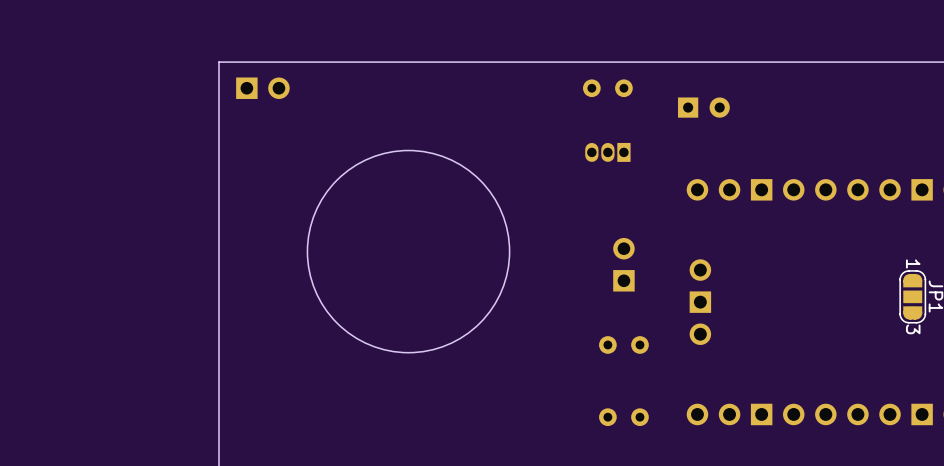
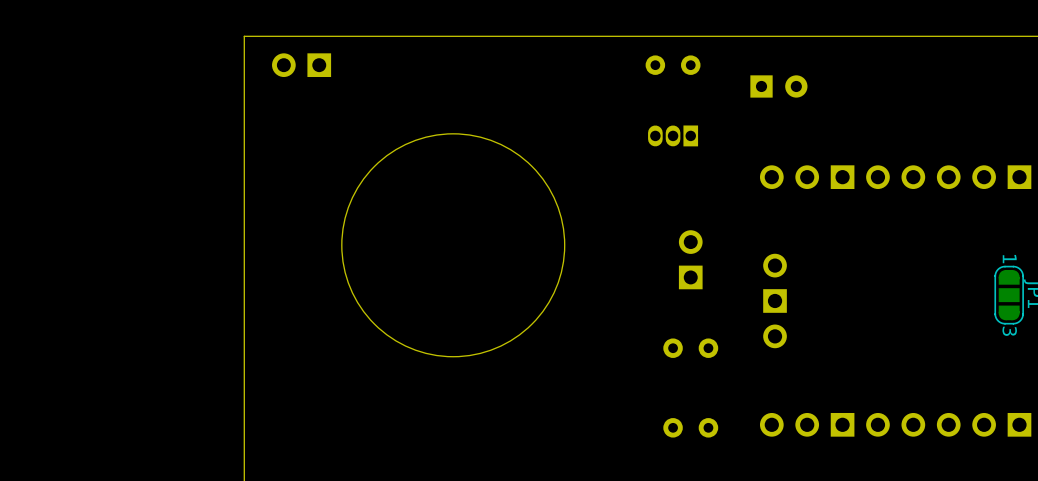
part rotation: 0° (262, 88) -> 180° (301, 65)

